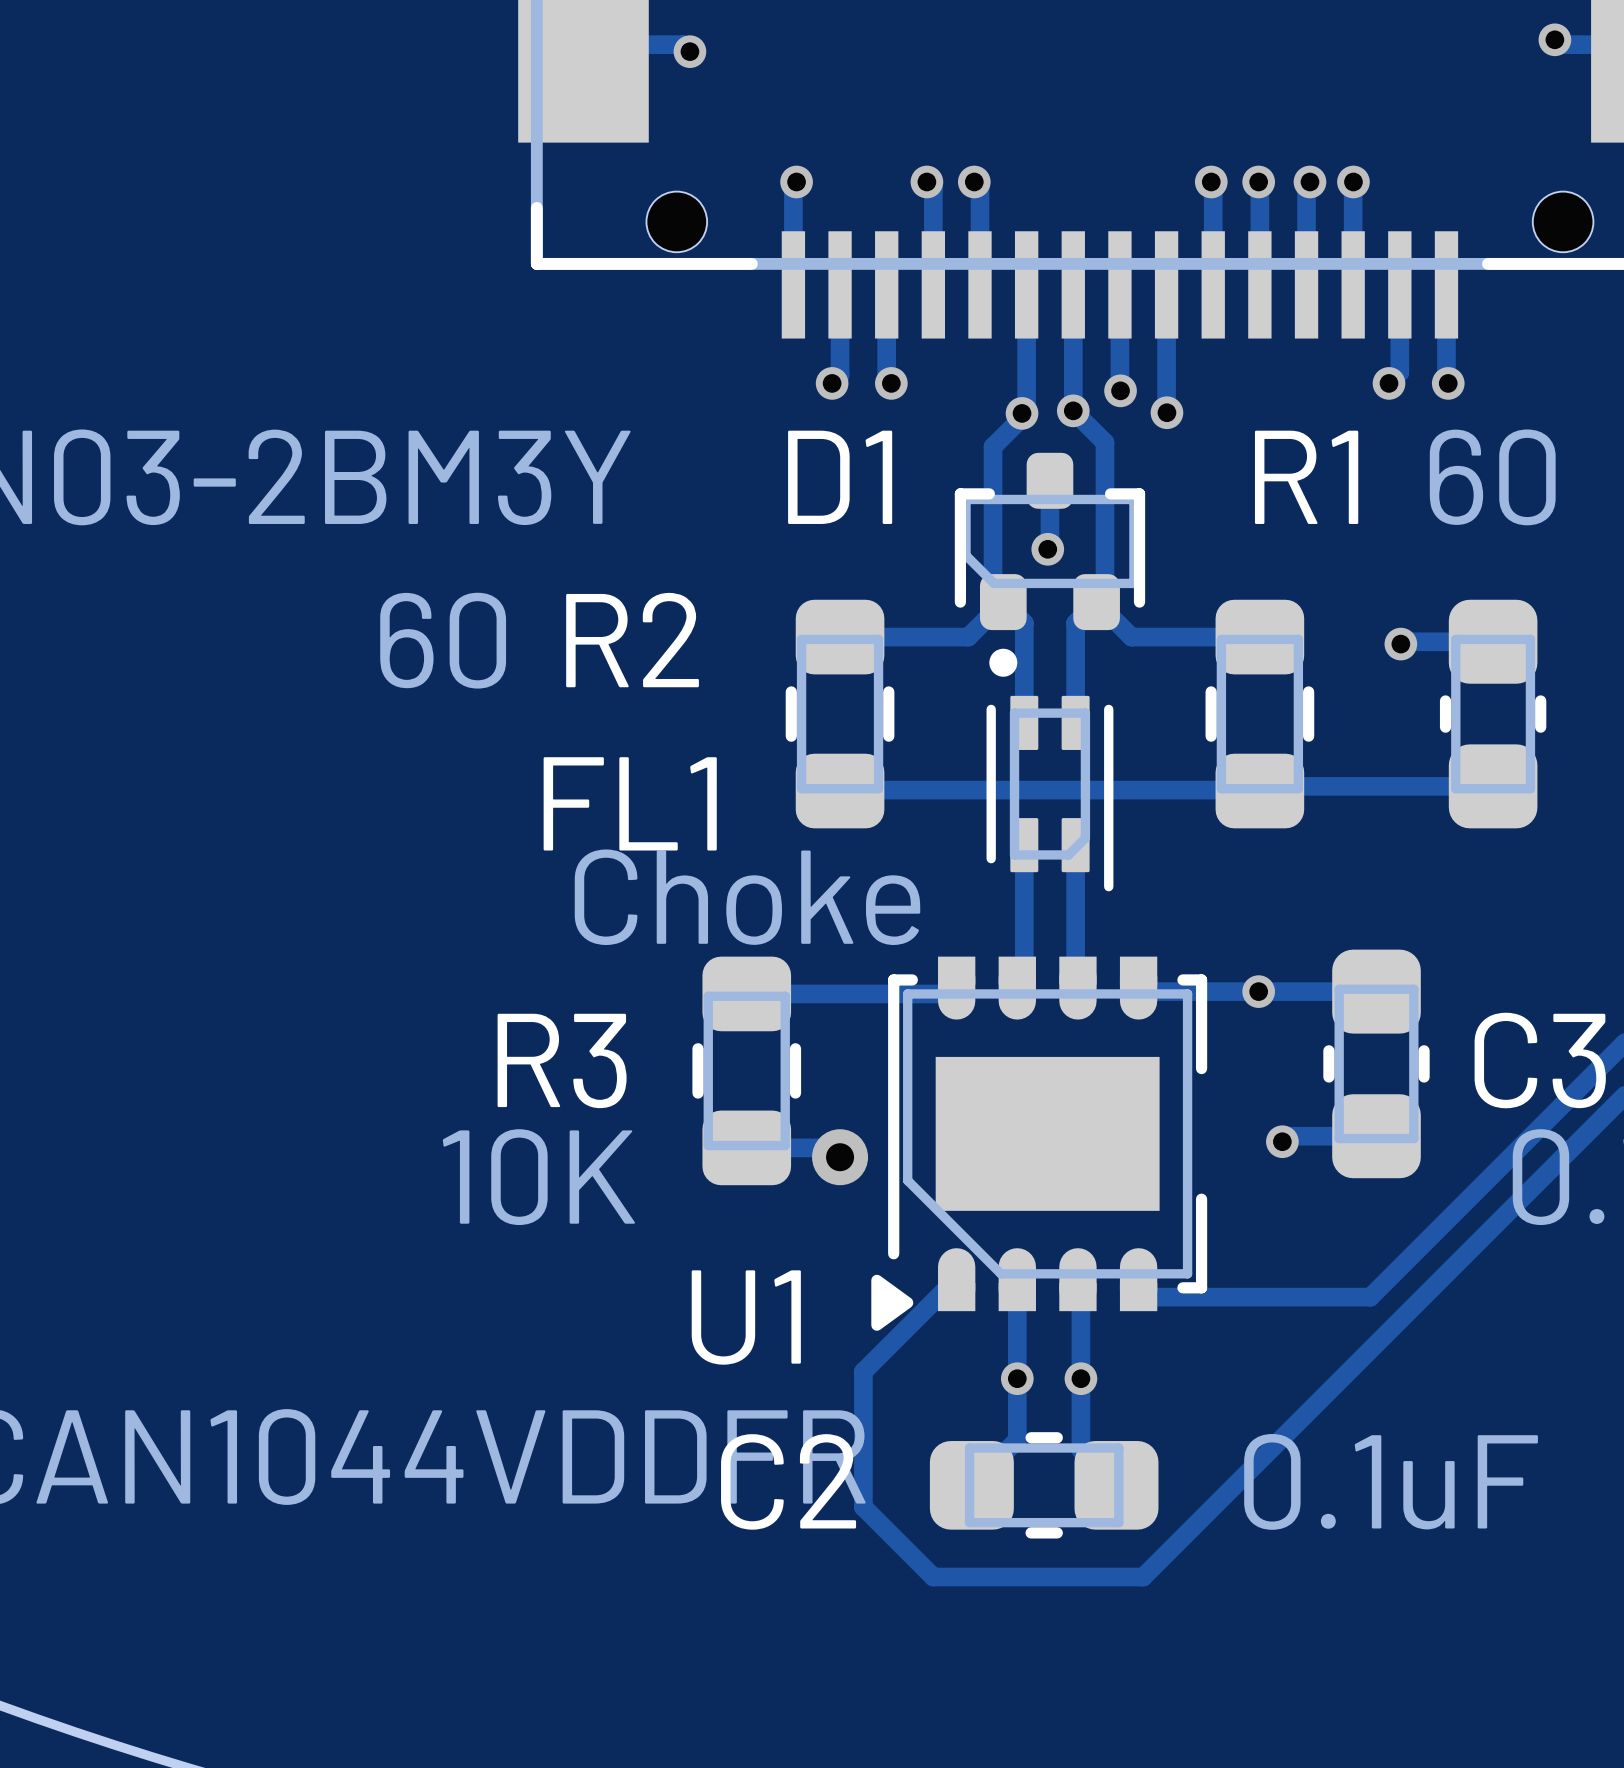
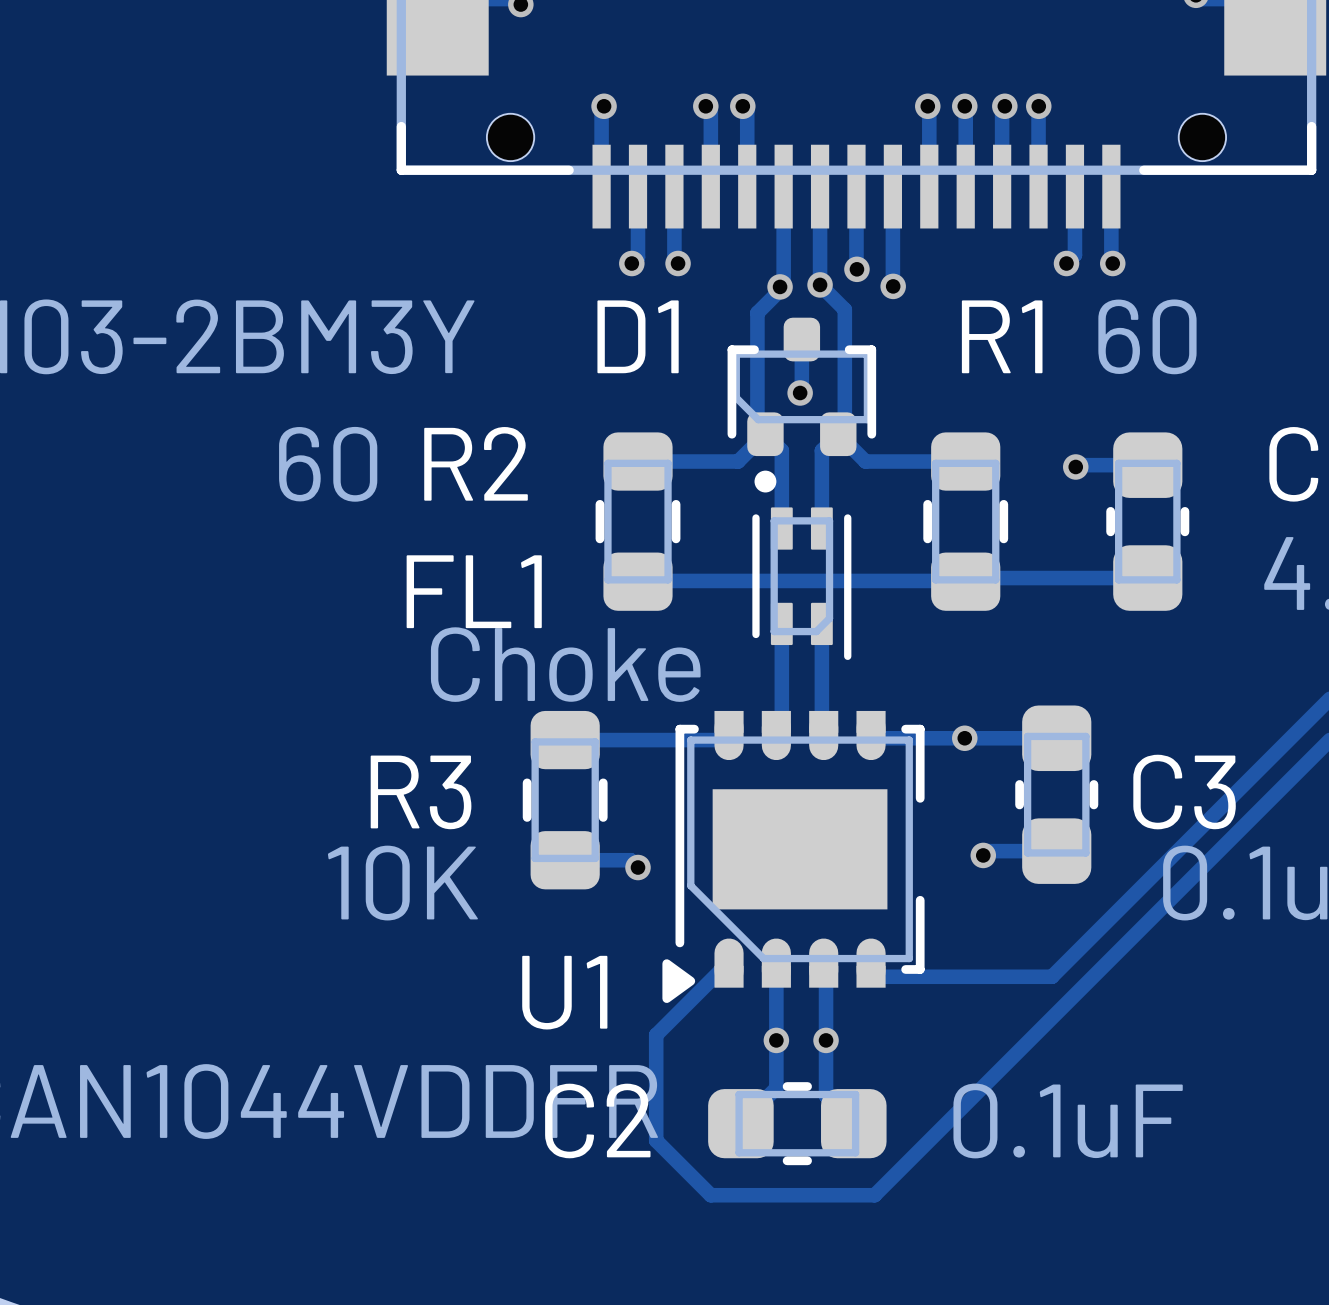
via size: [812, 1129, 869, 1186] -> [625, 854, 651, 881]

